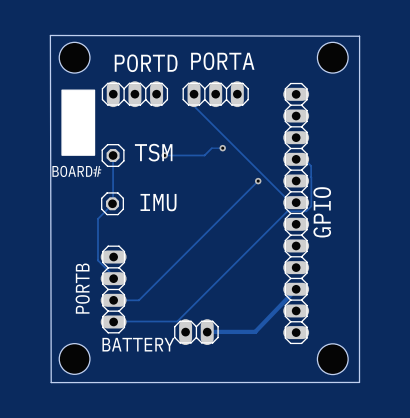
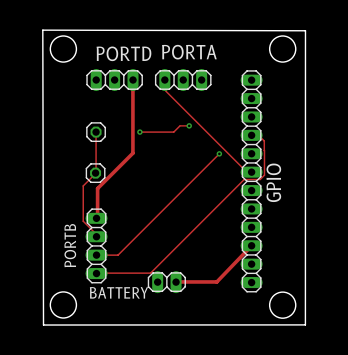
drawing: [61, 89, 96, 156] -> none
track: none -> (133, 80) (132, 153) (97, 188) (96, 218)
text: TSM (153, 152) -> none
text: BOARD# (76, 171) -> none
text: IMU (158, 202) -> none

